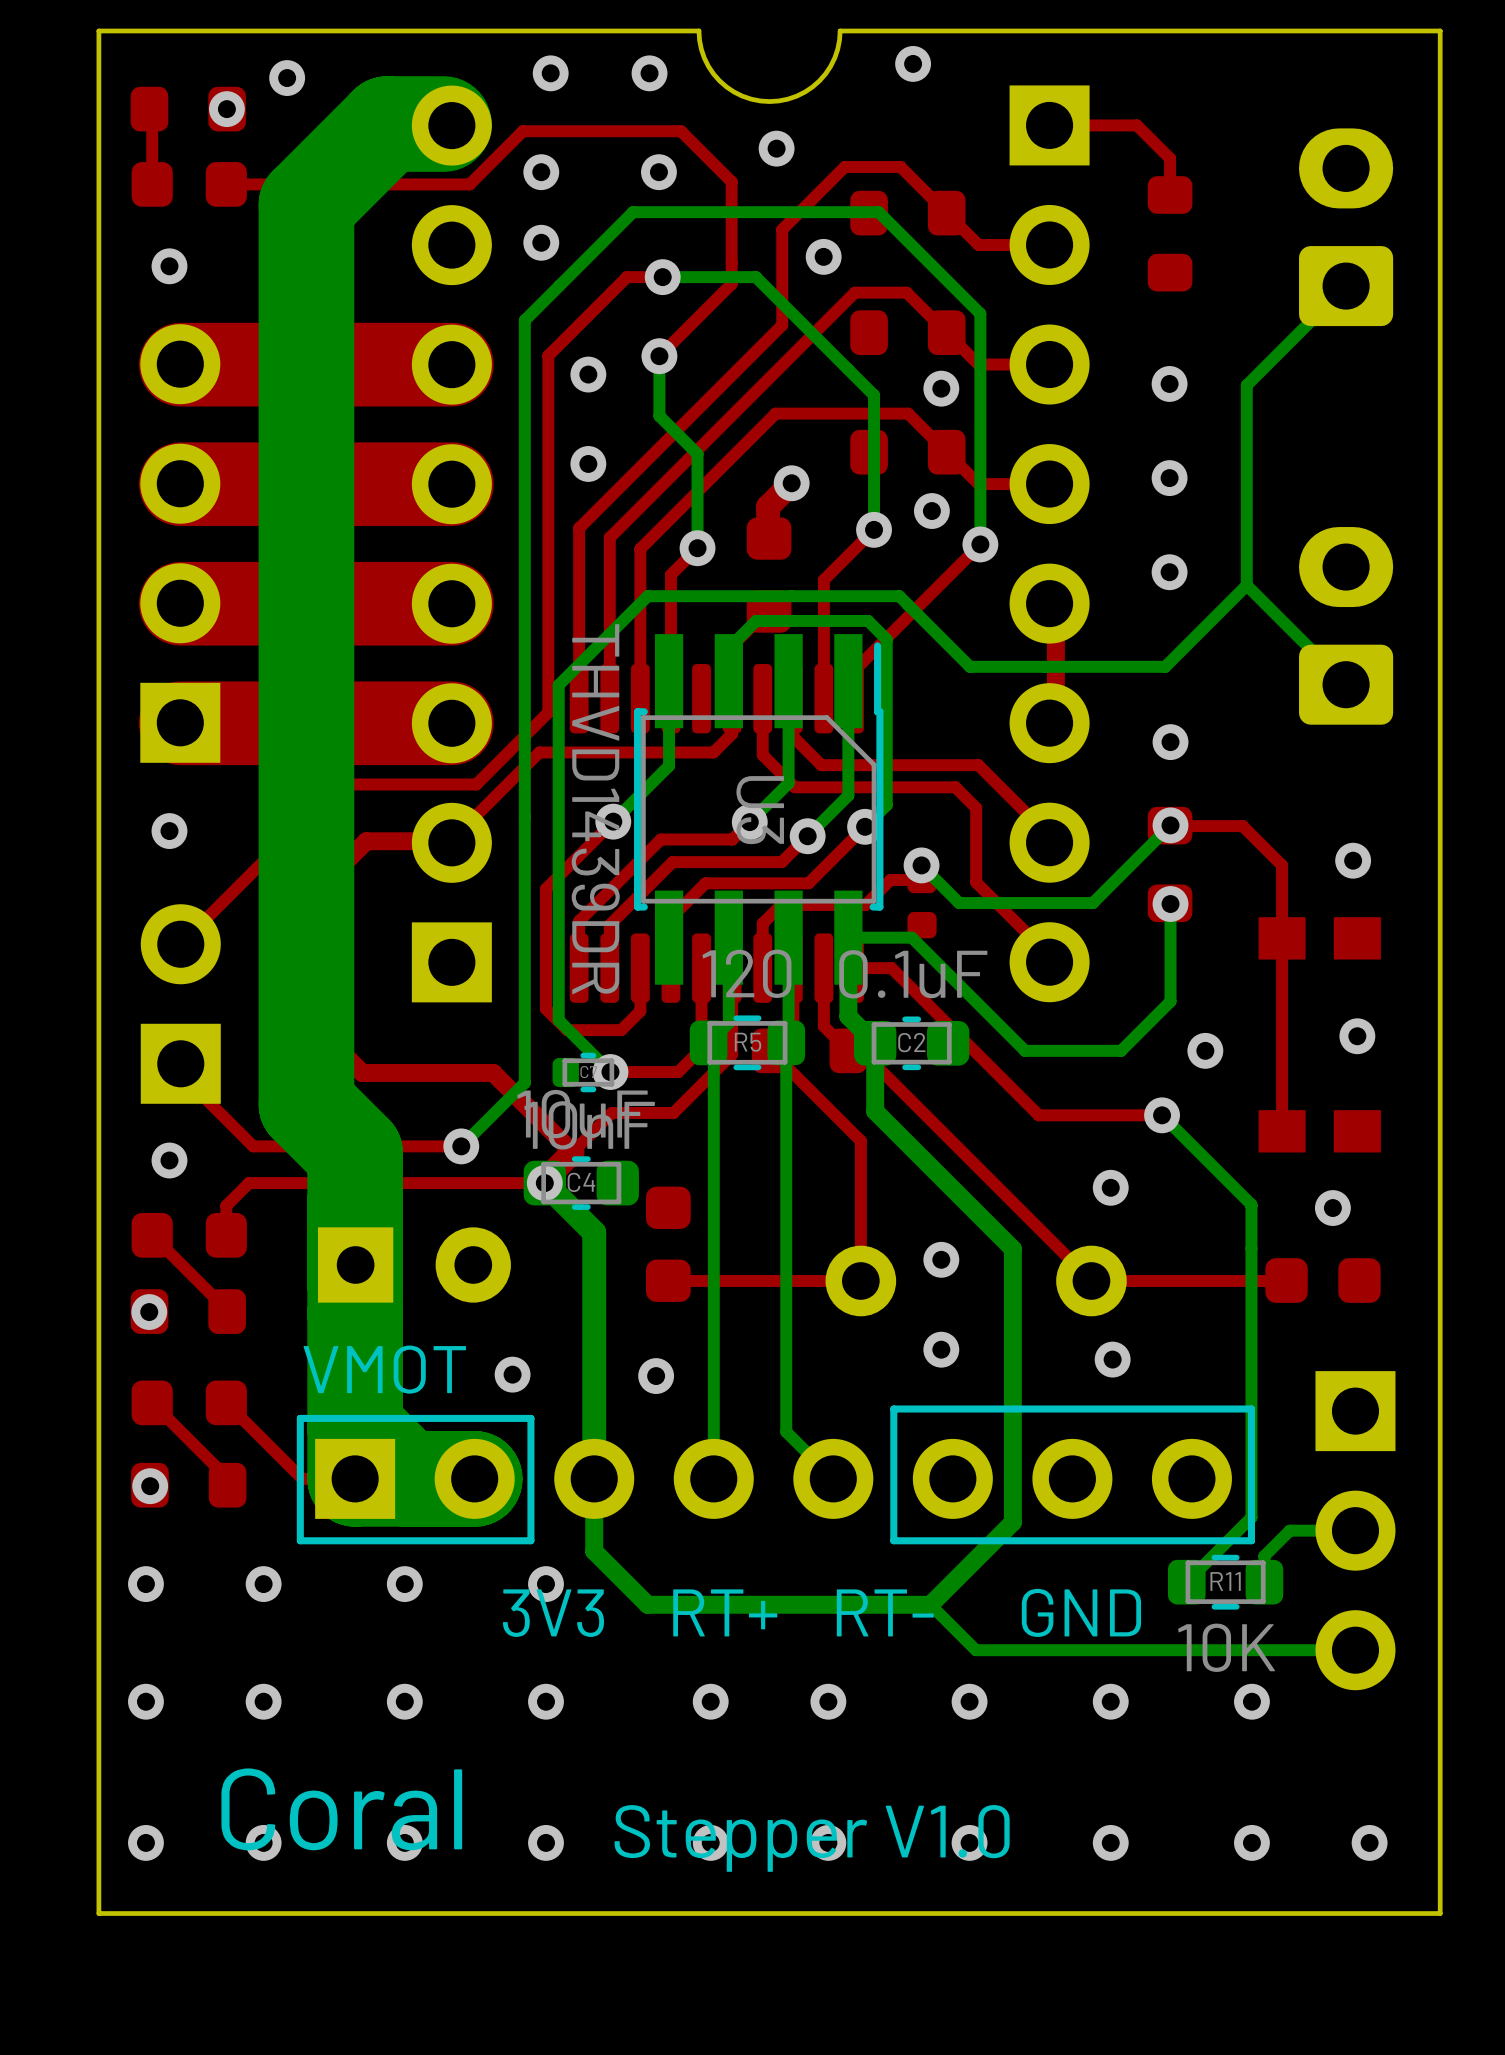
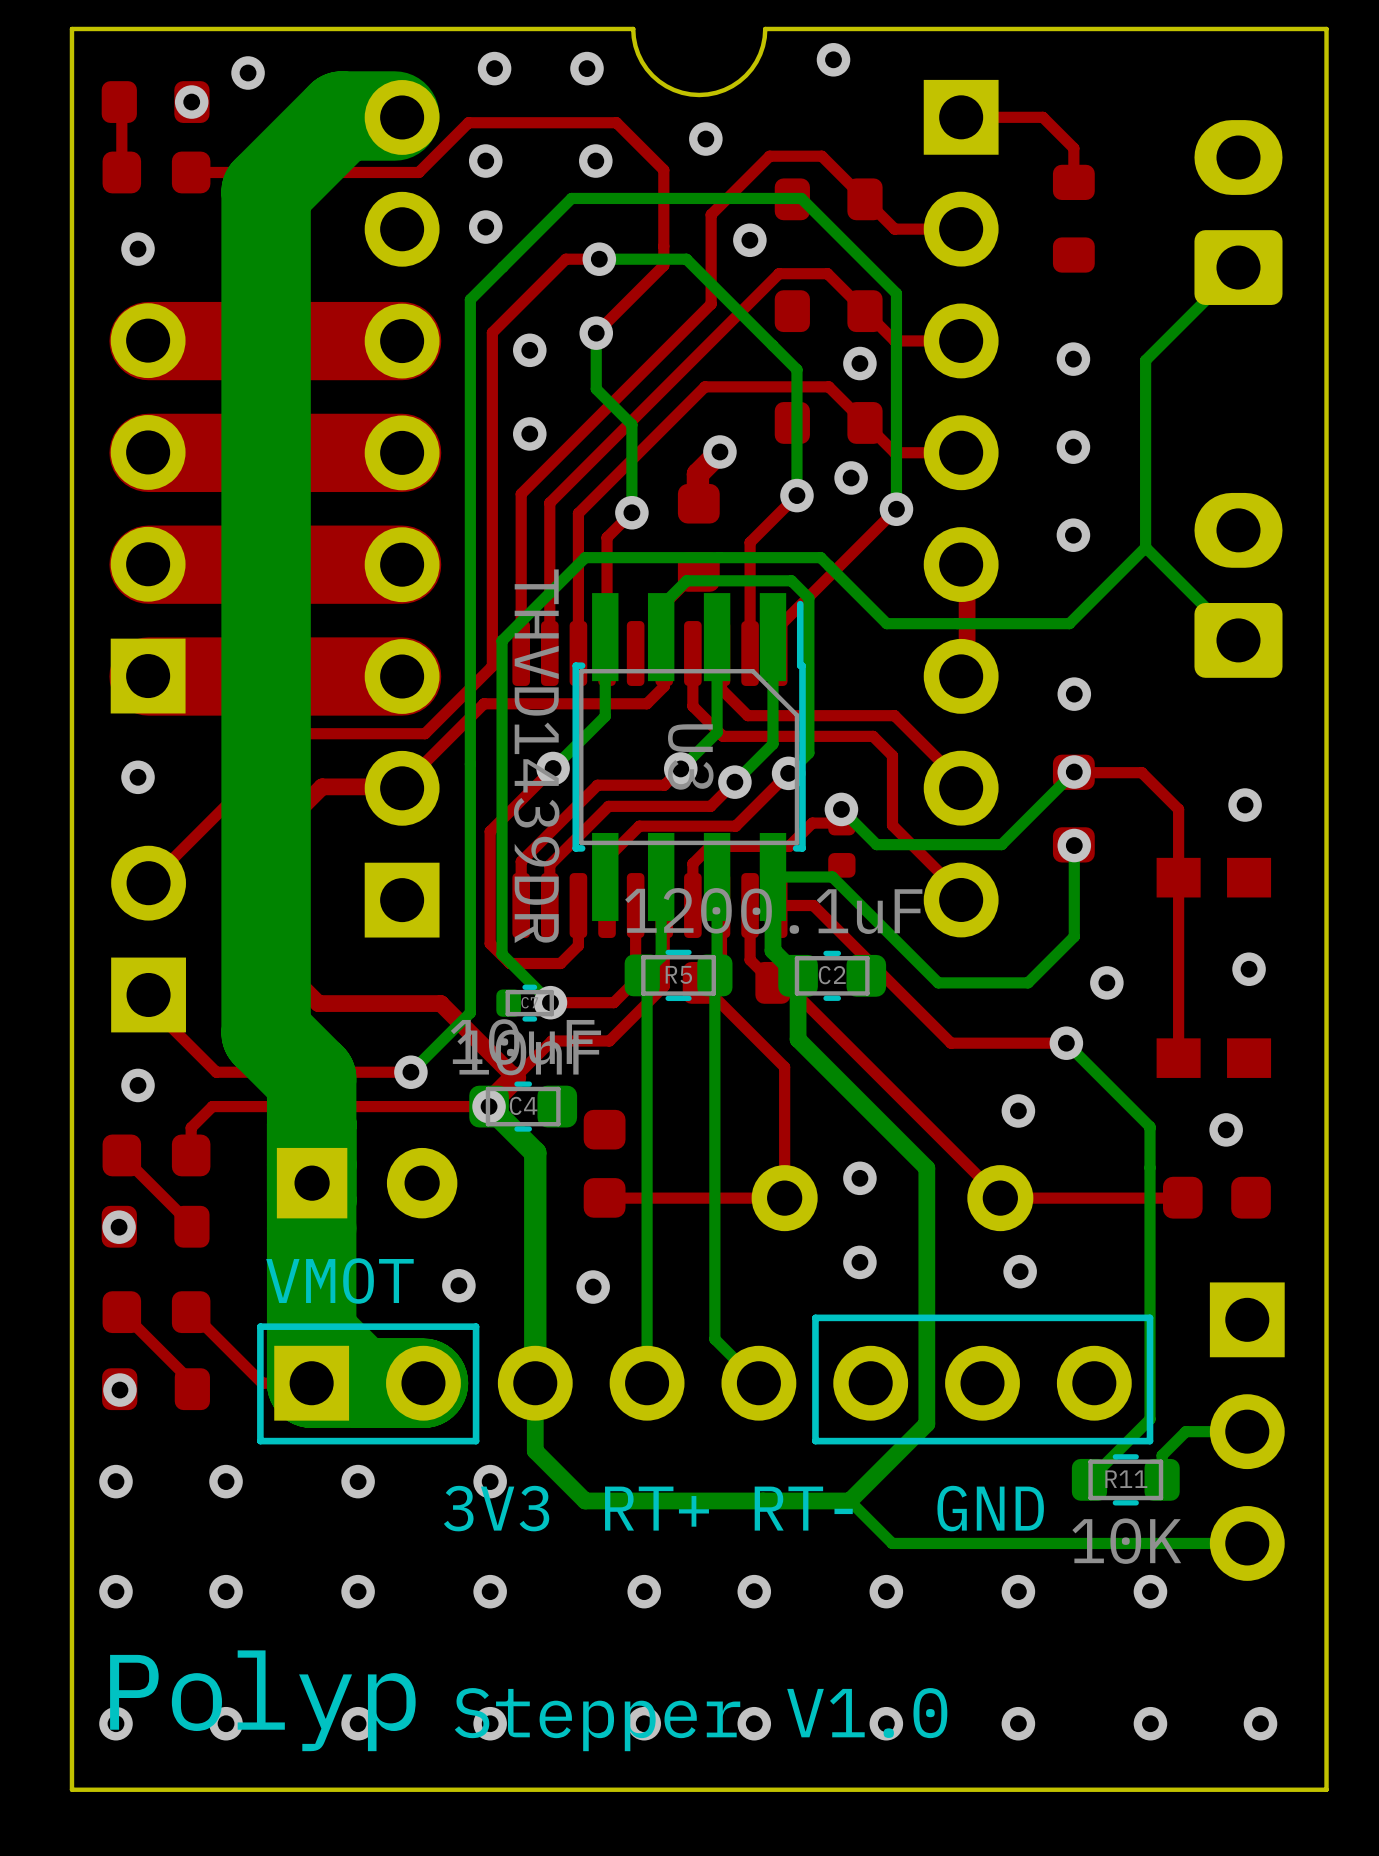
text: Coral (341, 1809) -> Polyp (262, 1700)
text position: Stepper V1.0 (812, 1838) -> Stepper V1.0 (701, 1719)

